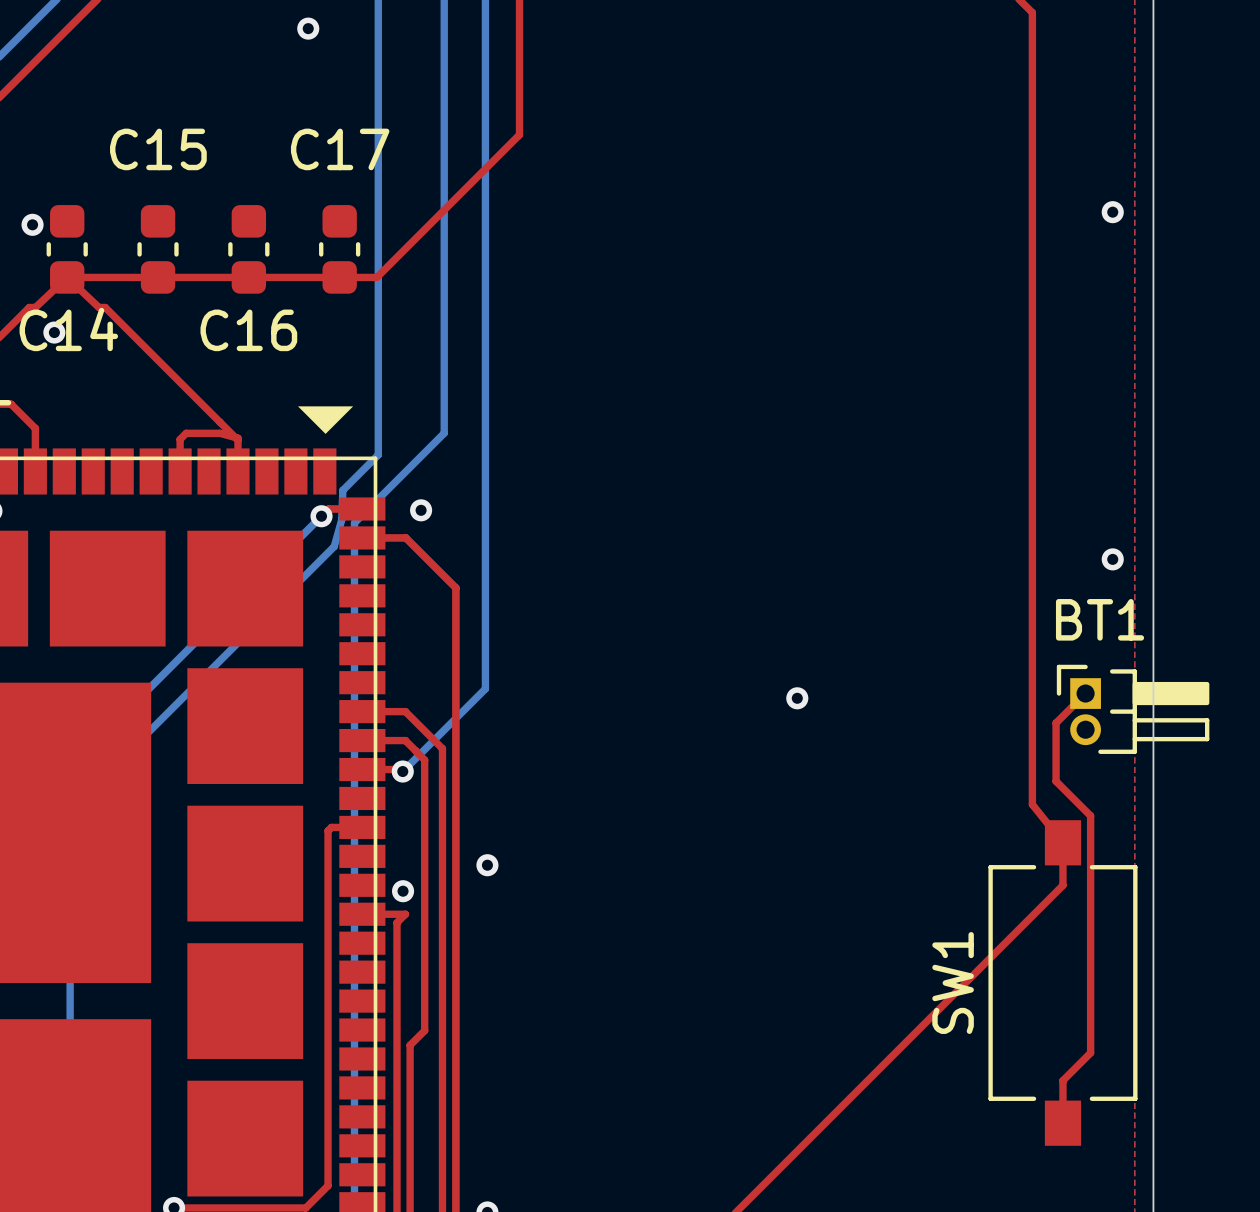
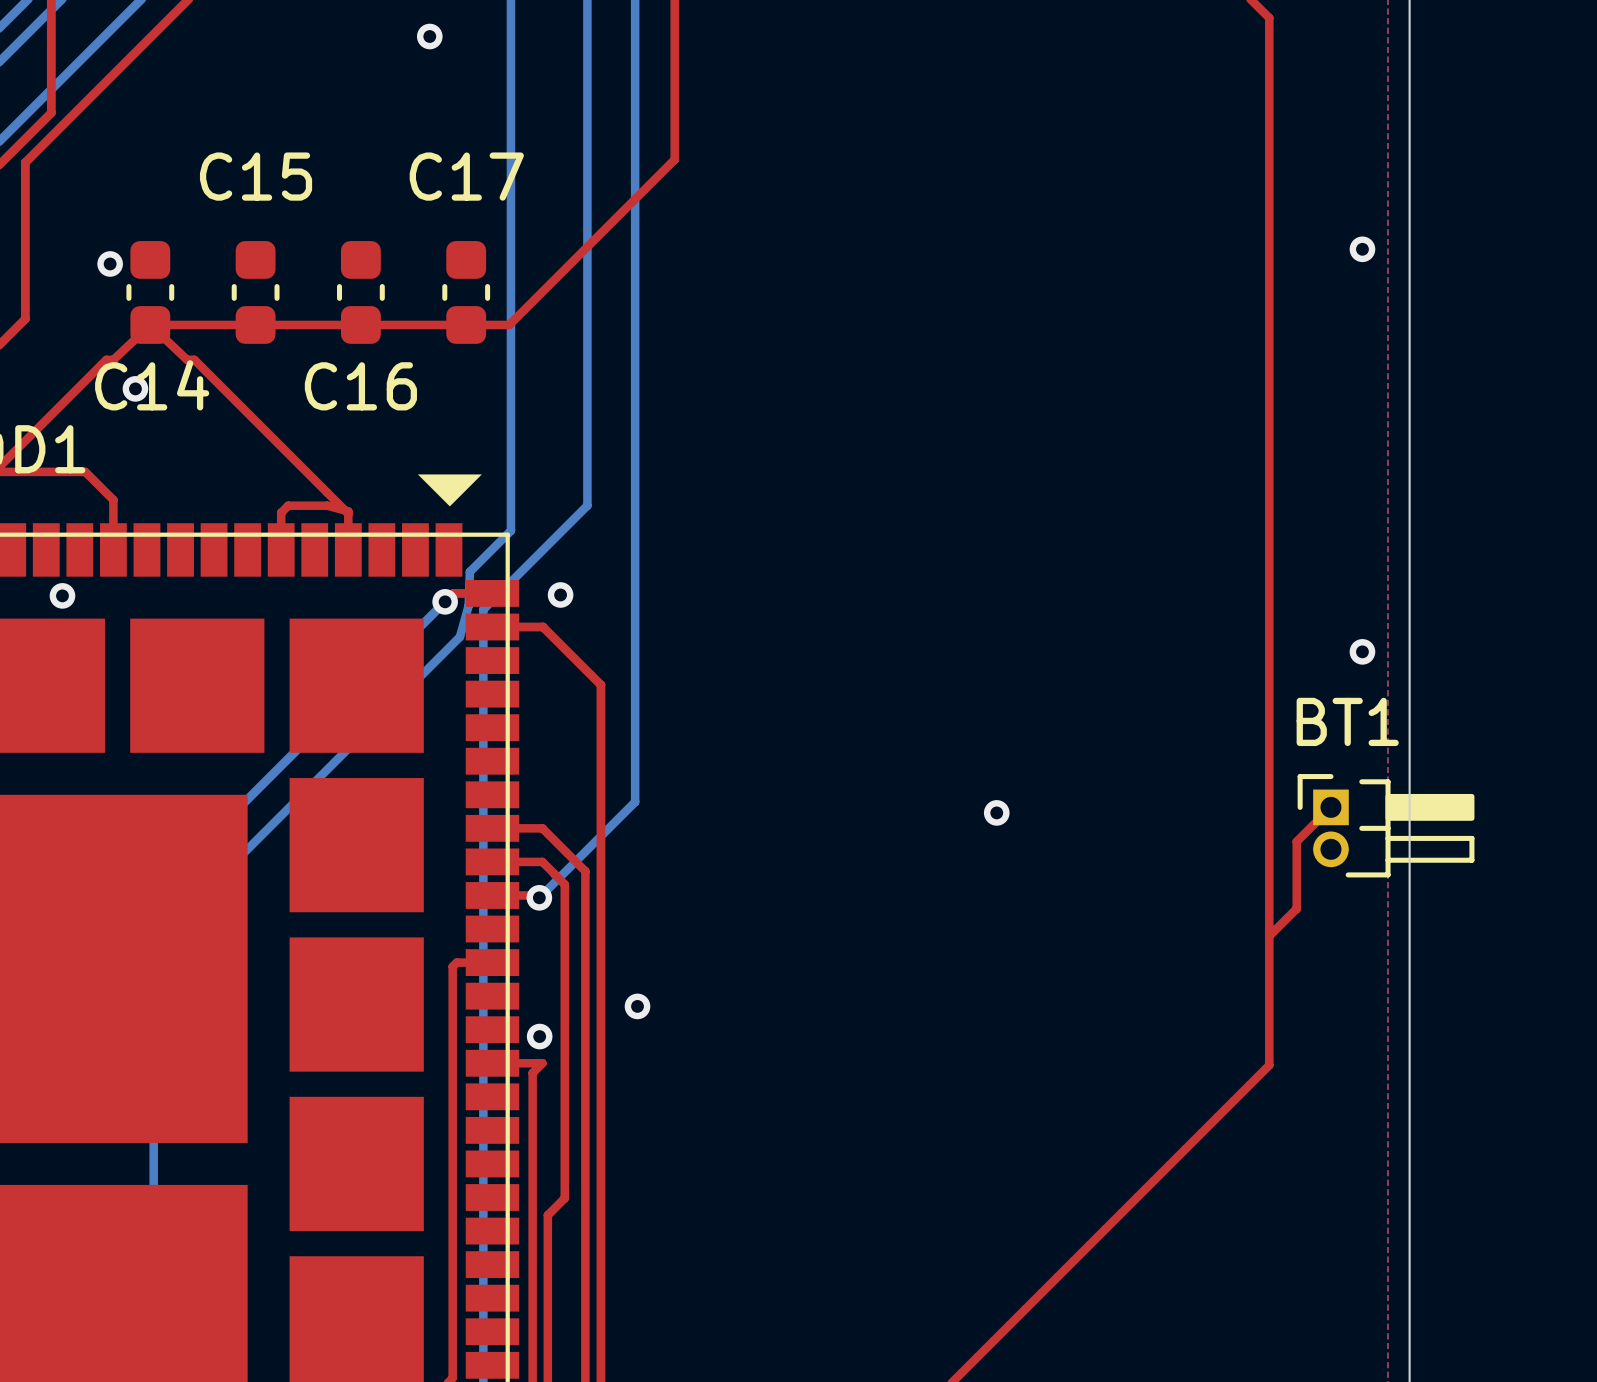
top track: (1056, 781) (1090, 815) (1090, 1052) (1062, 1080) (1062, 1123) -> none
top track: (1032, 804) (1062, 842) (1062, 885) (1032, 915) -> (1296, 909) (1269, 936) (1269, 1065)
SW1: (1062, 983) -> none

